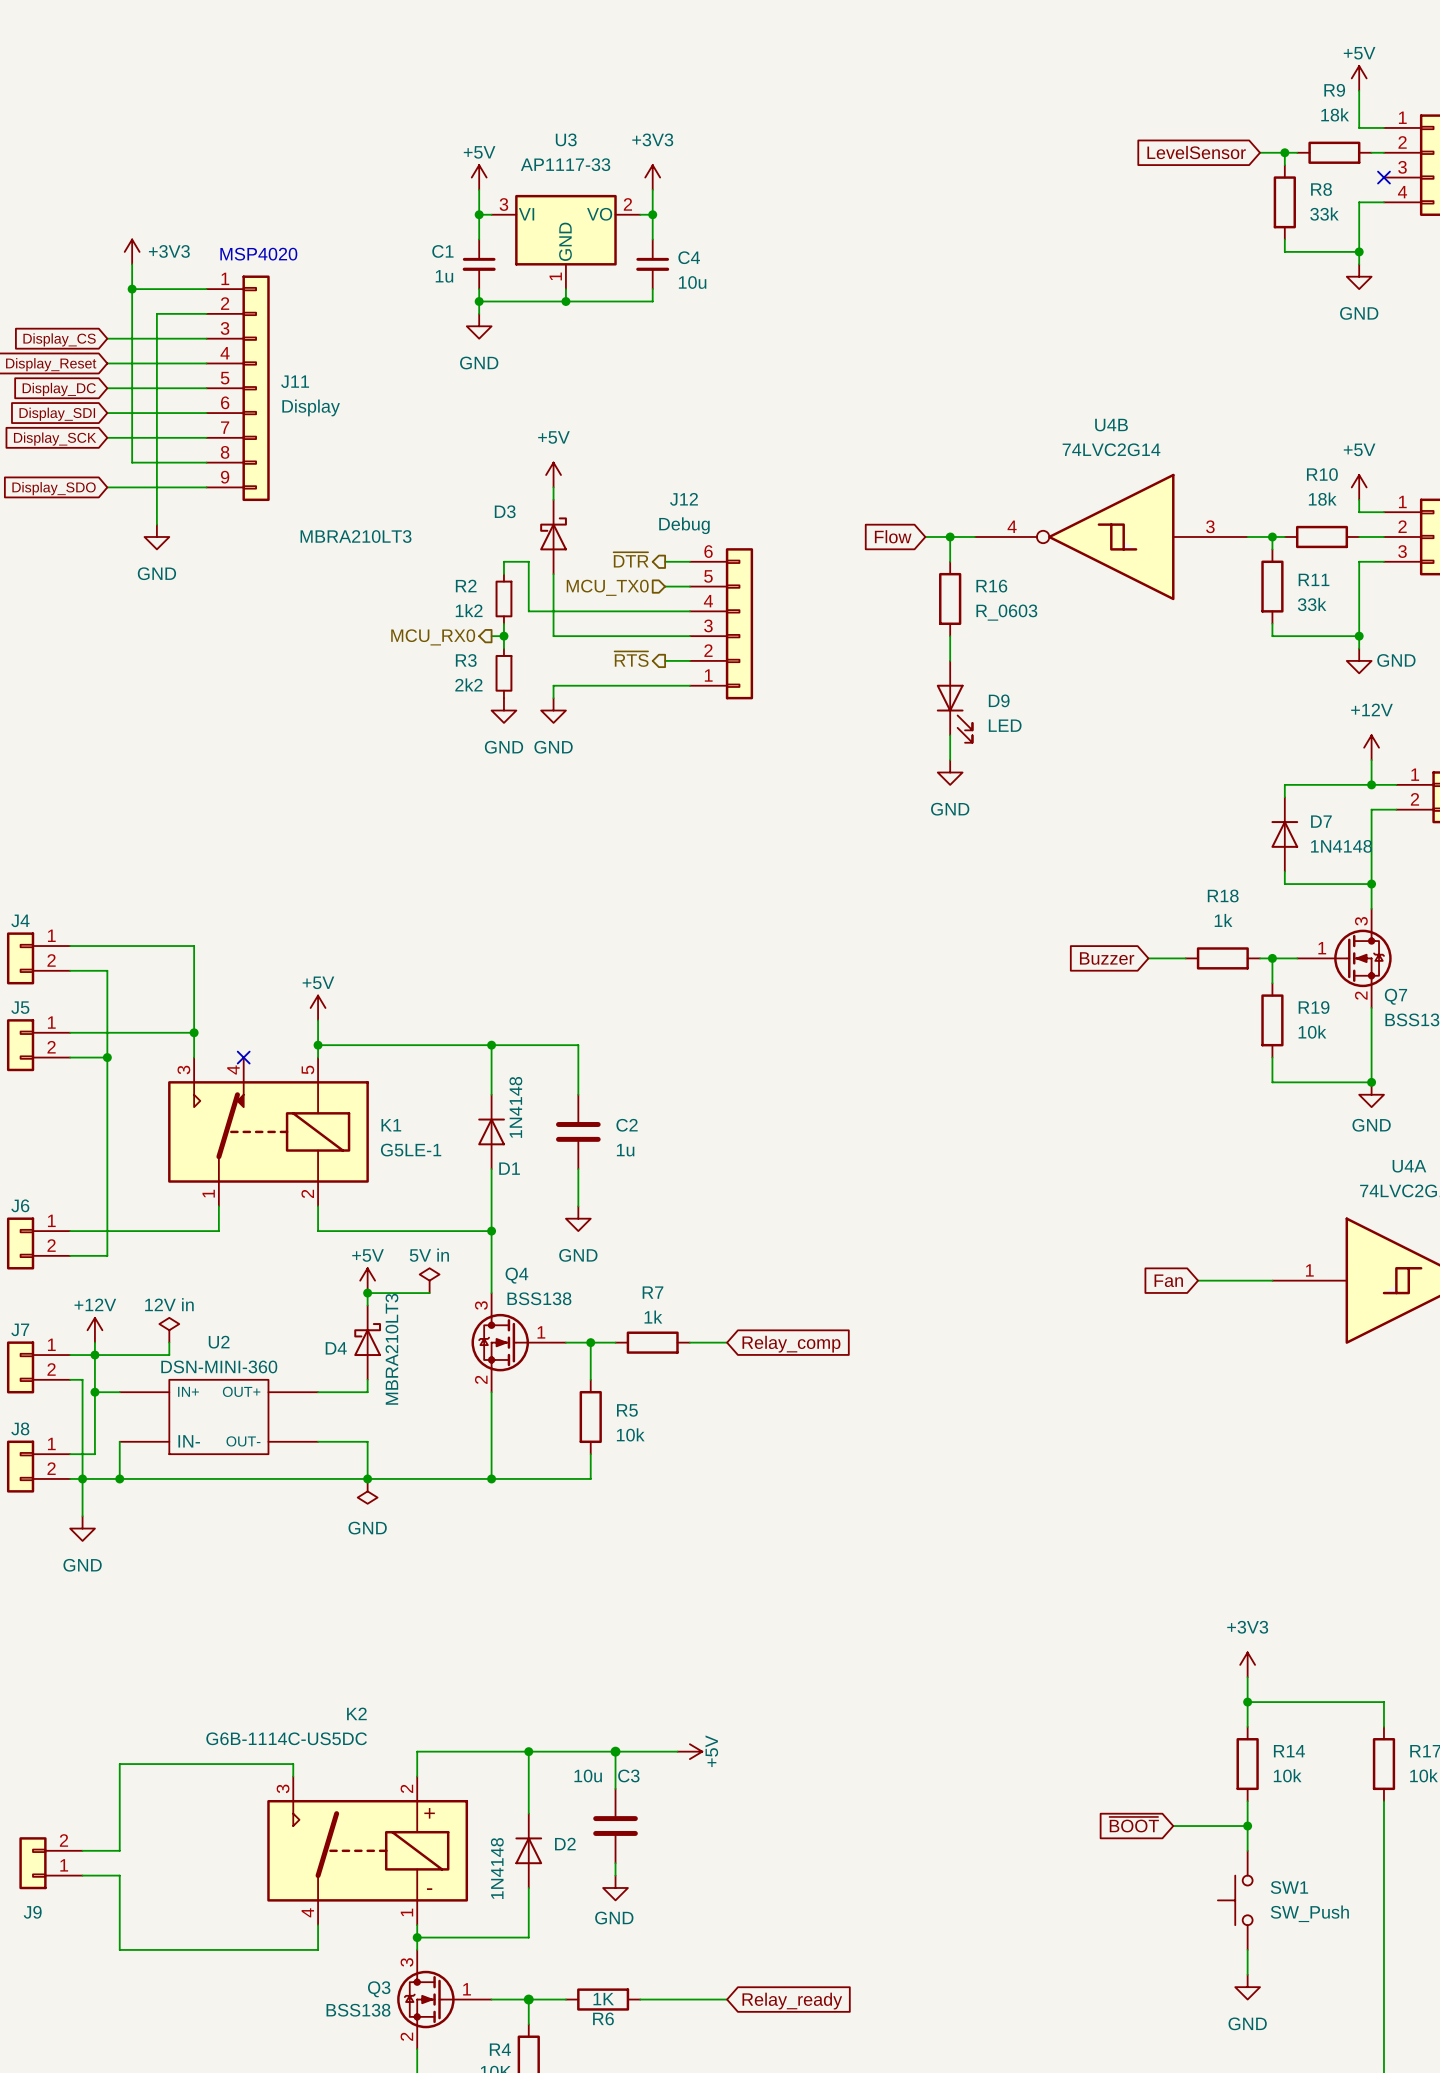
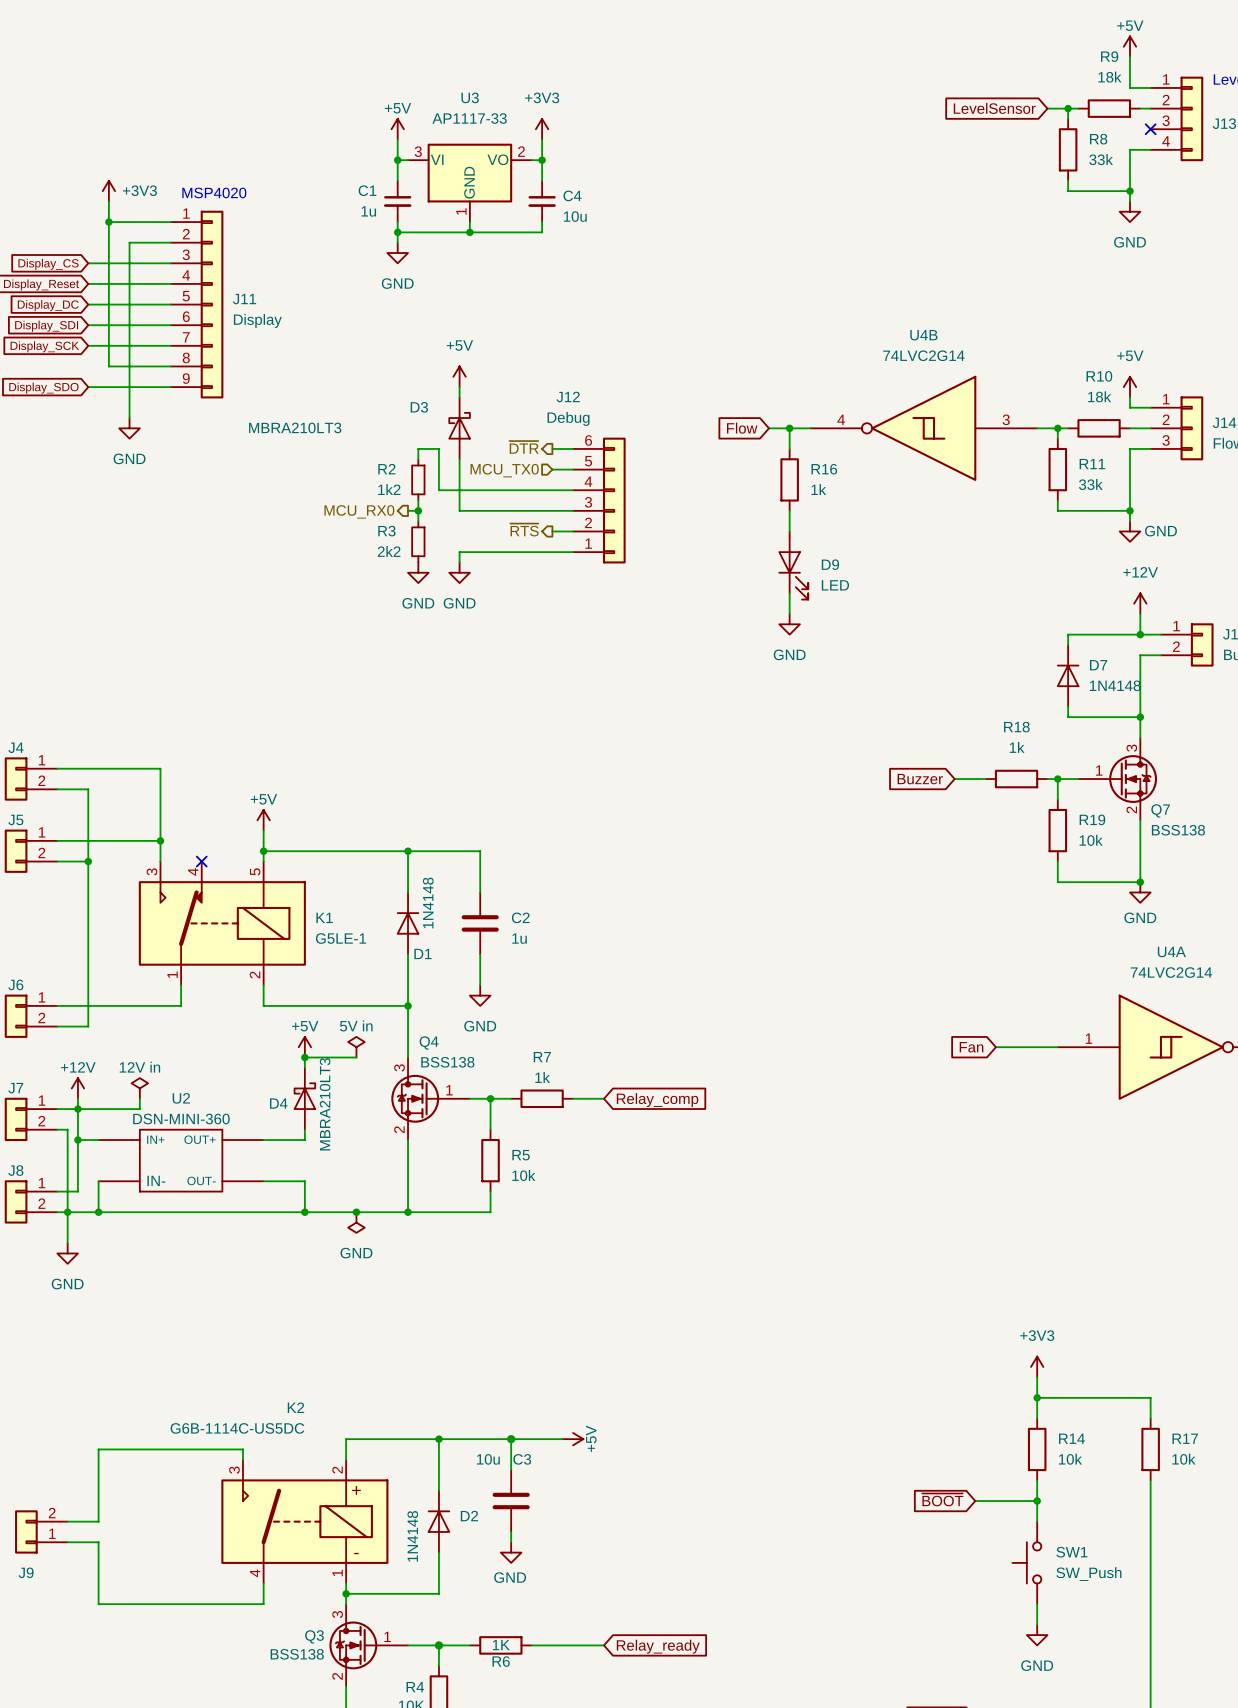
R16 value: R_0603 (1006, 612) -> 1k (818, 489)
junction: none -> (356, 1212)
power symbol position: GND (367, 1491) -> GND (356, 1222)

